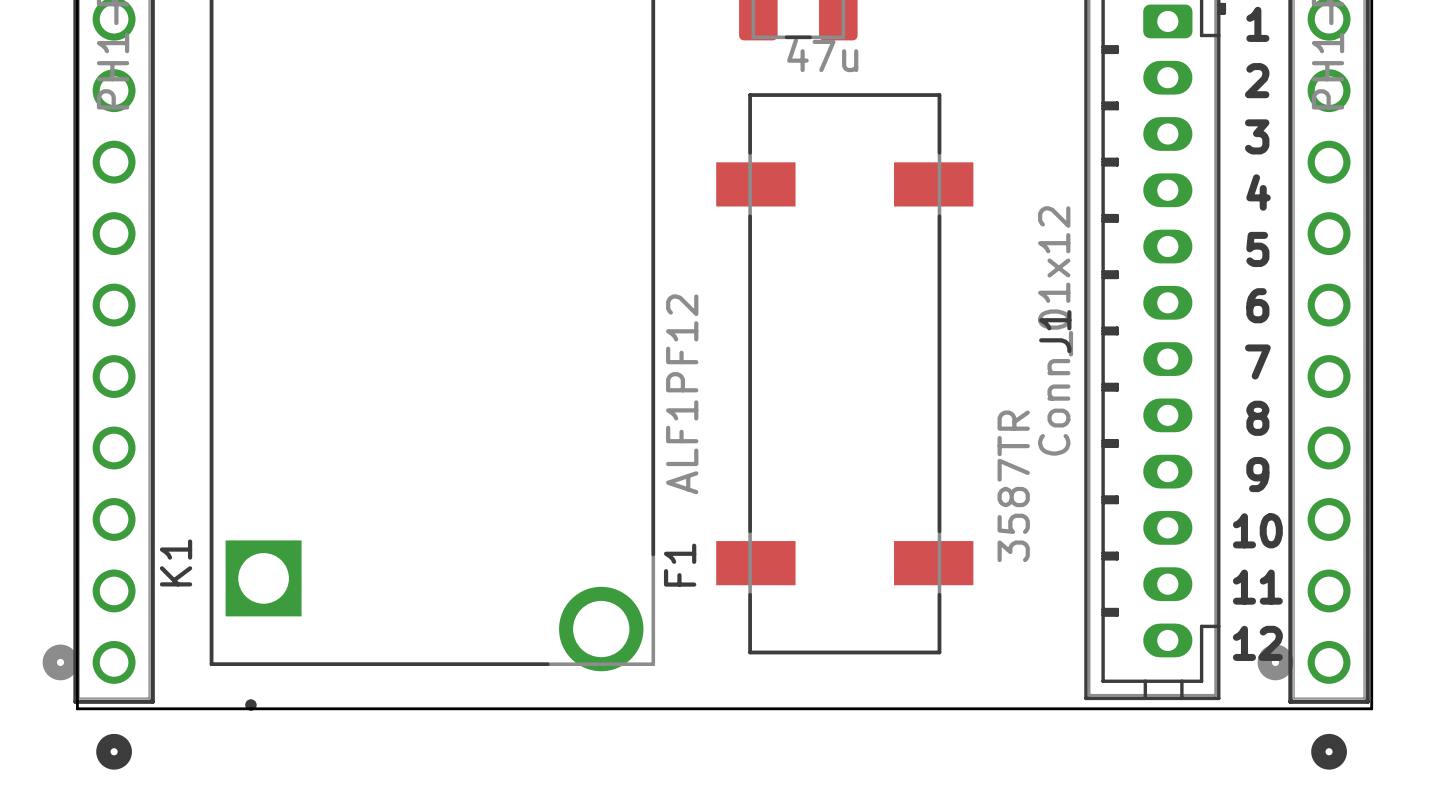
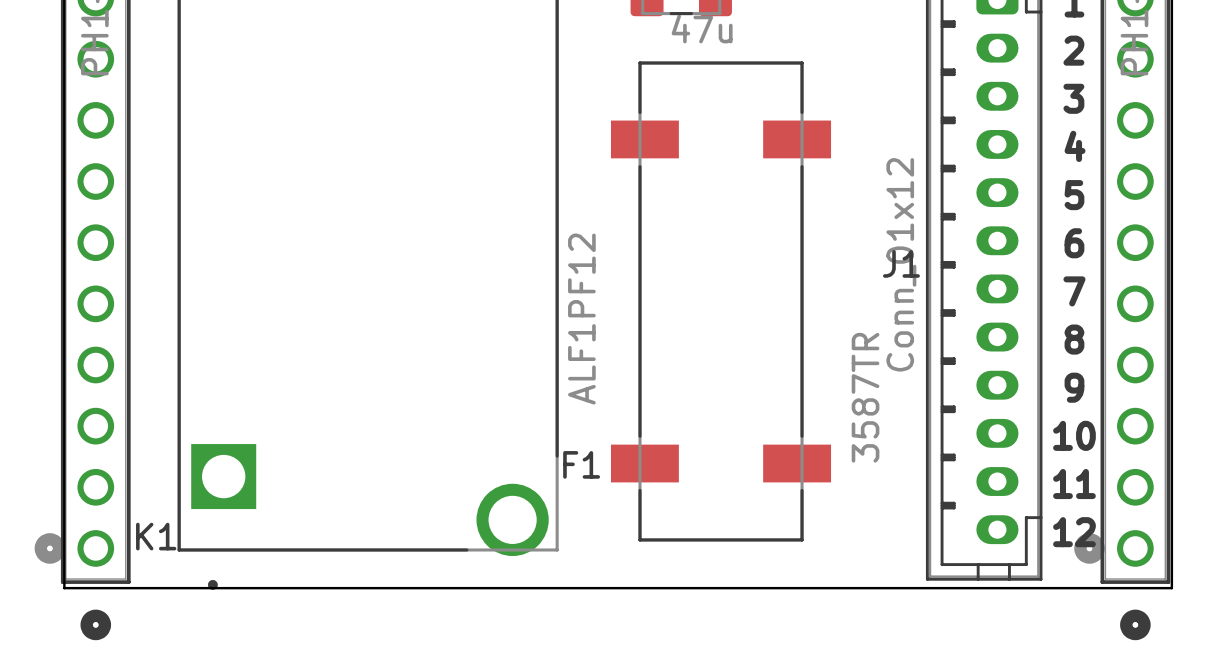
J1 name rotation: 0° (1055, 331) -> 90° clockwise (901, 263)
K1 name rotation: 0° (176, 562) -> 90° clockwise (156, 536)
K1 name position: K1 (176, 562) -> K1 (156, 536)
F1 name rotation: 0° (680, 565) -> 90° clockwise (581, 464)

